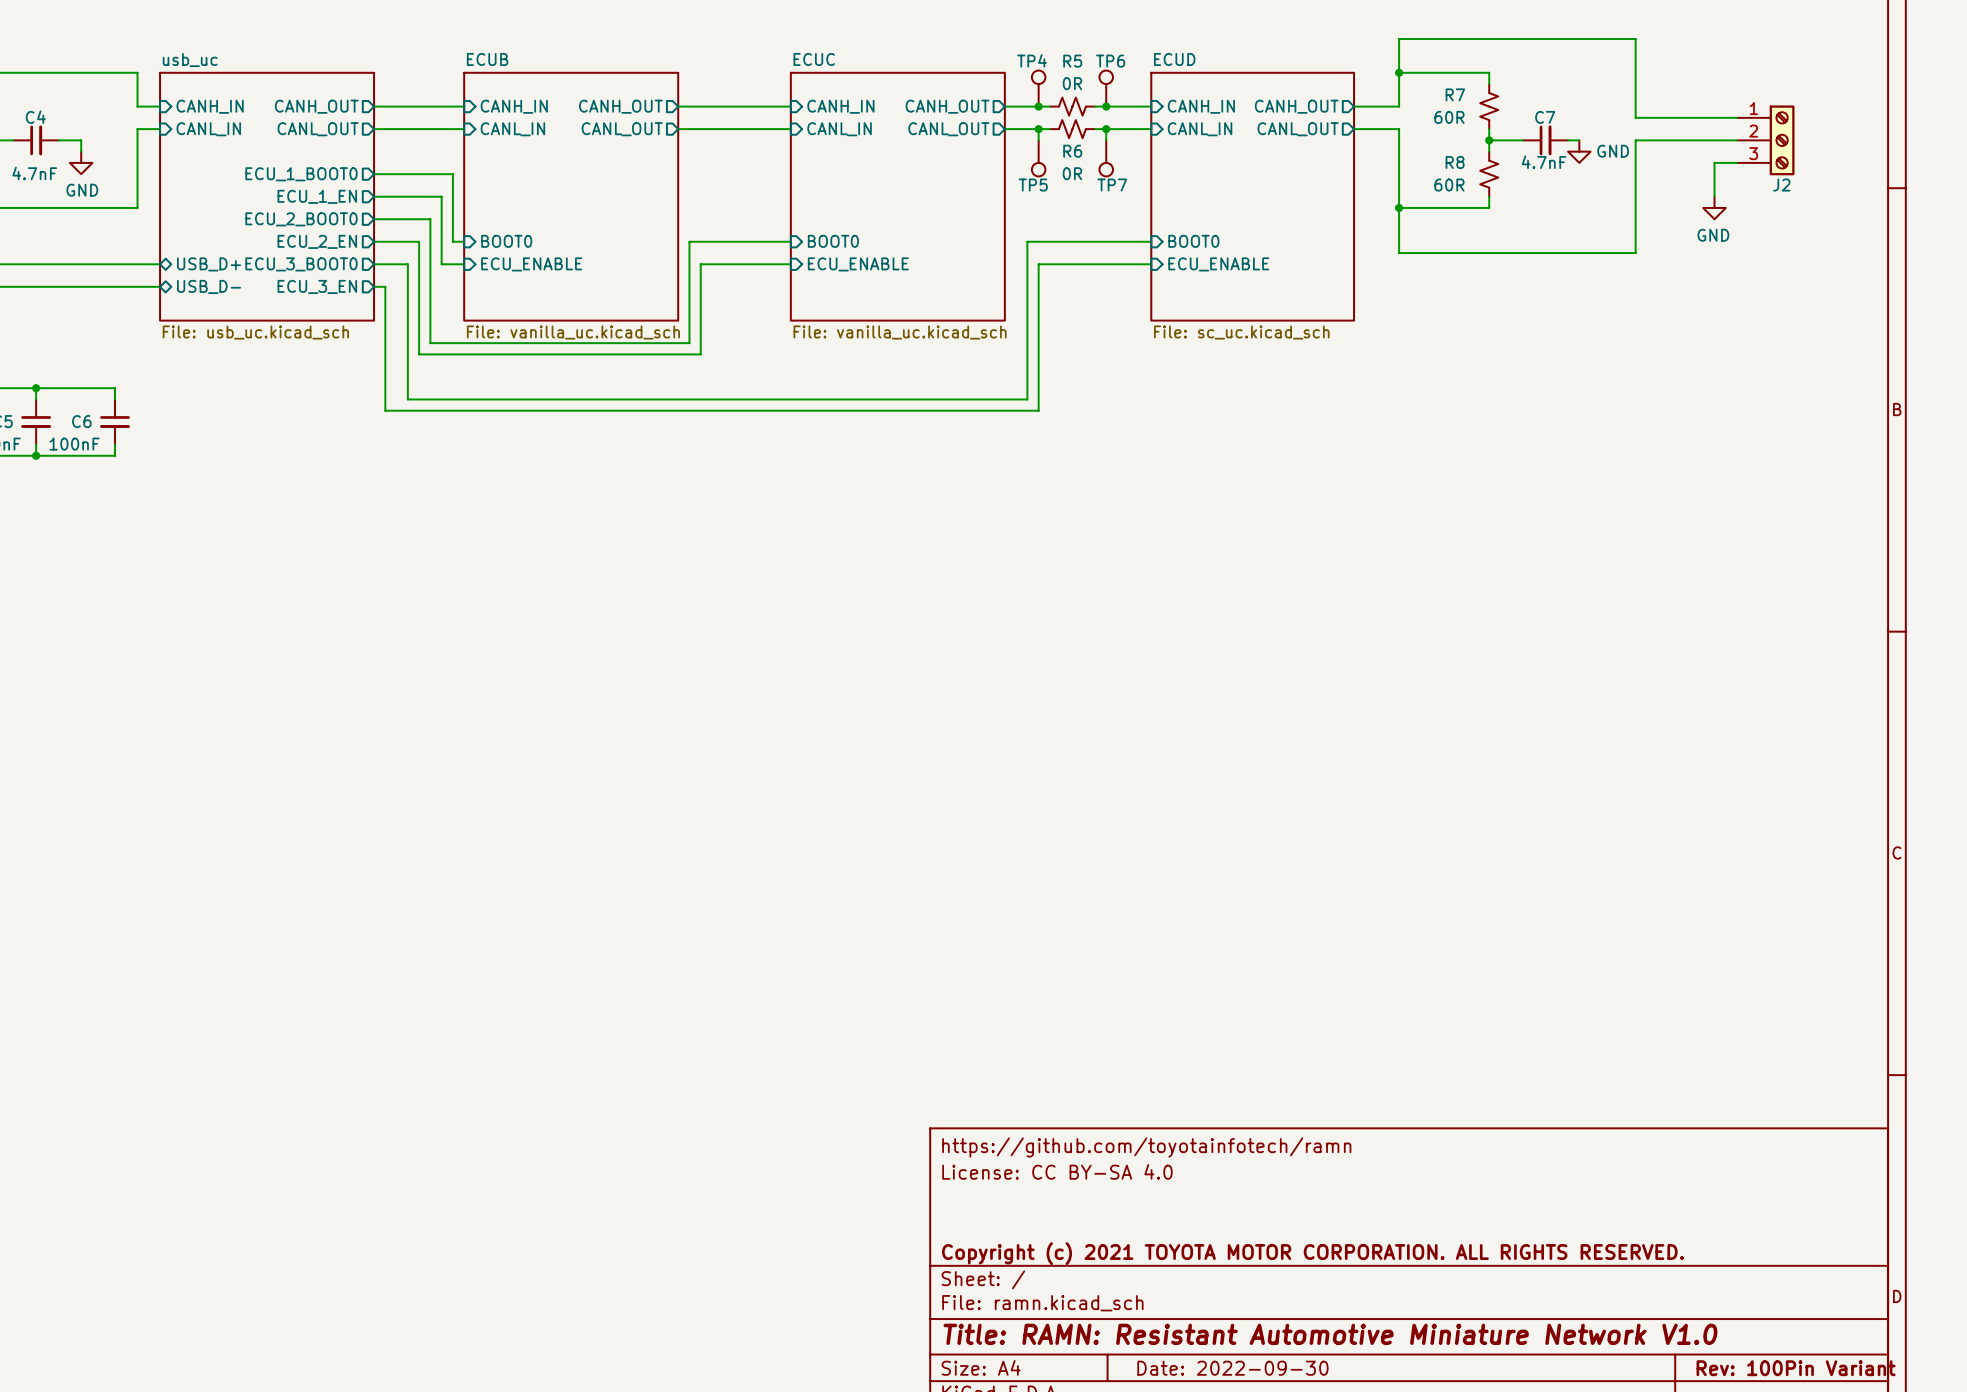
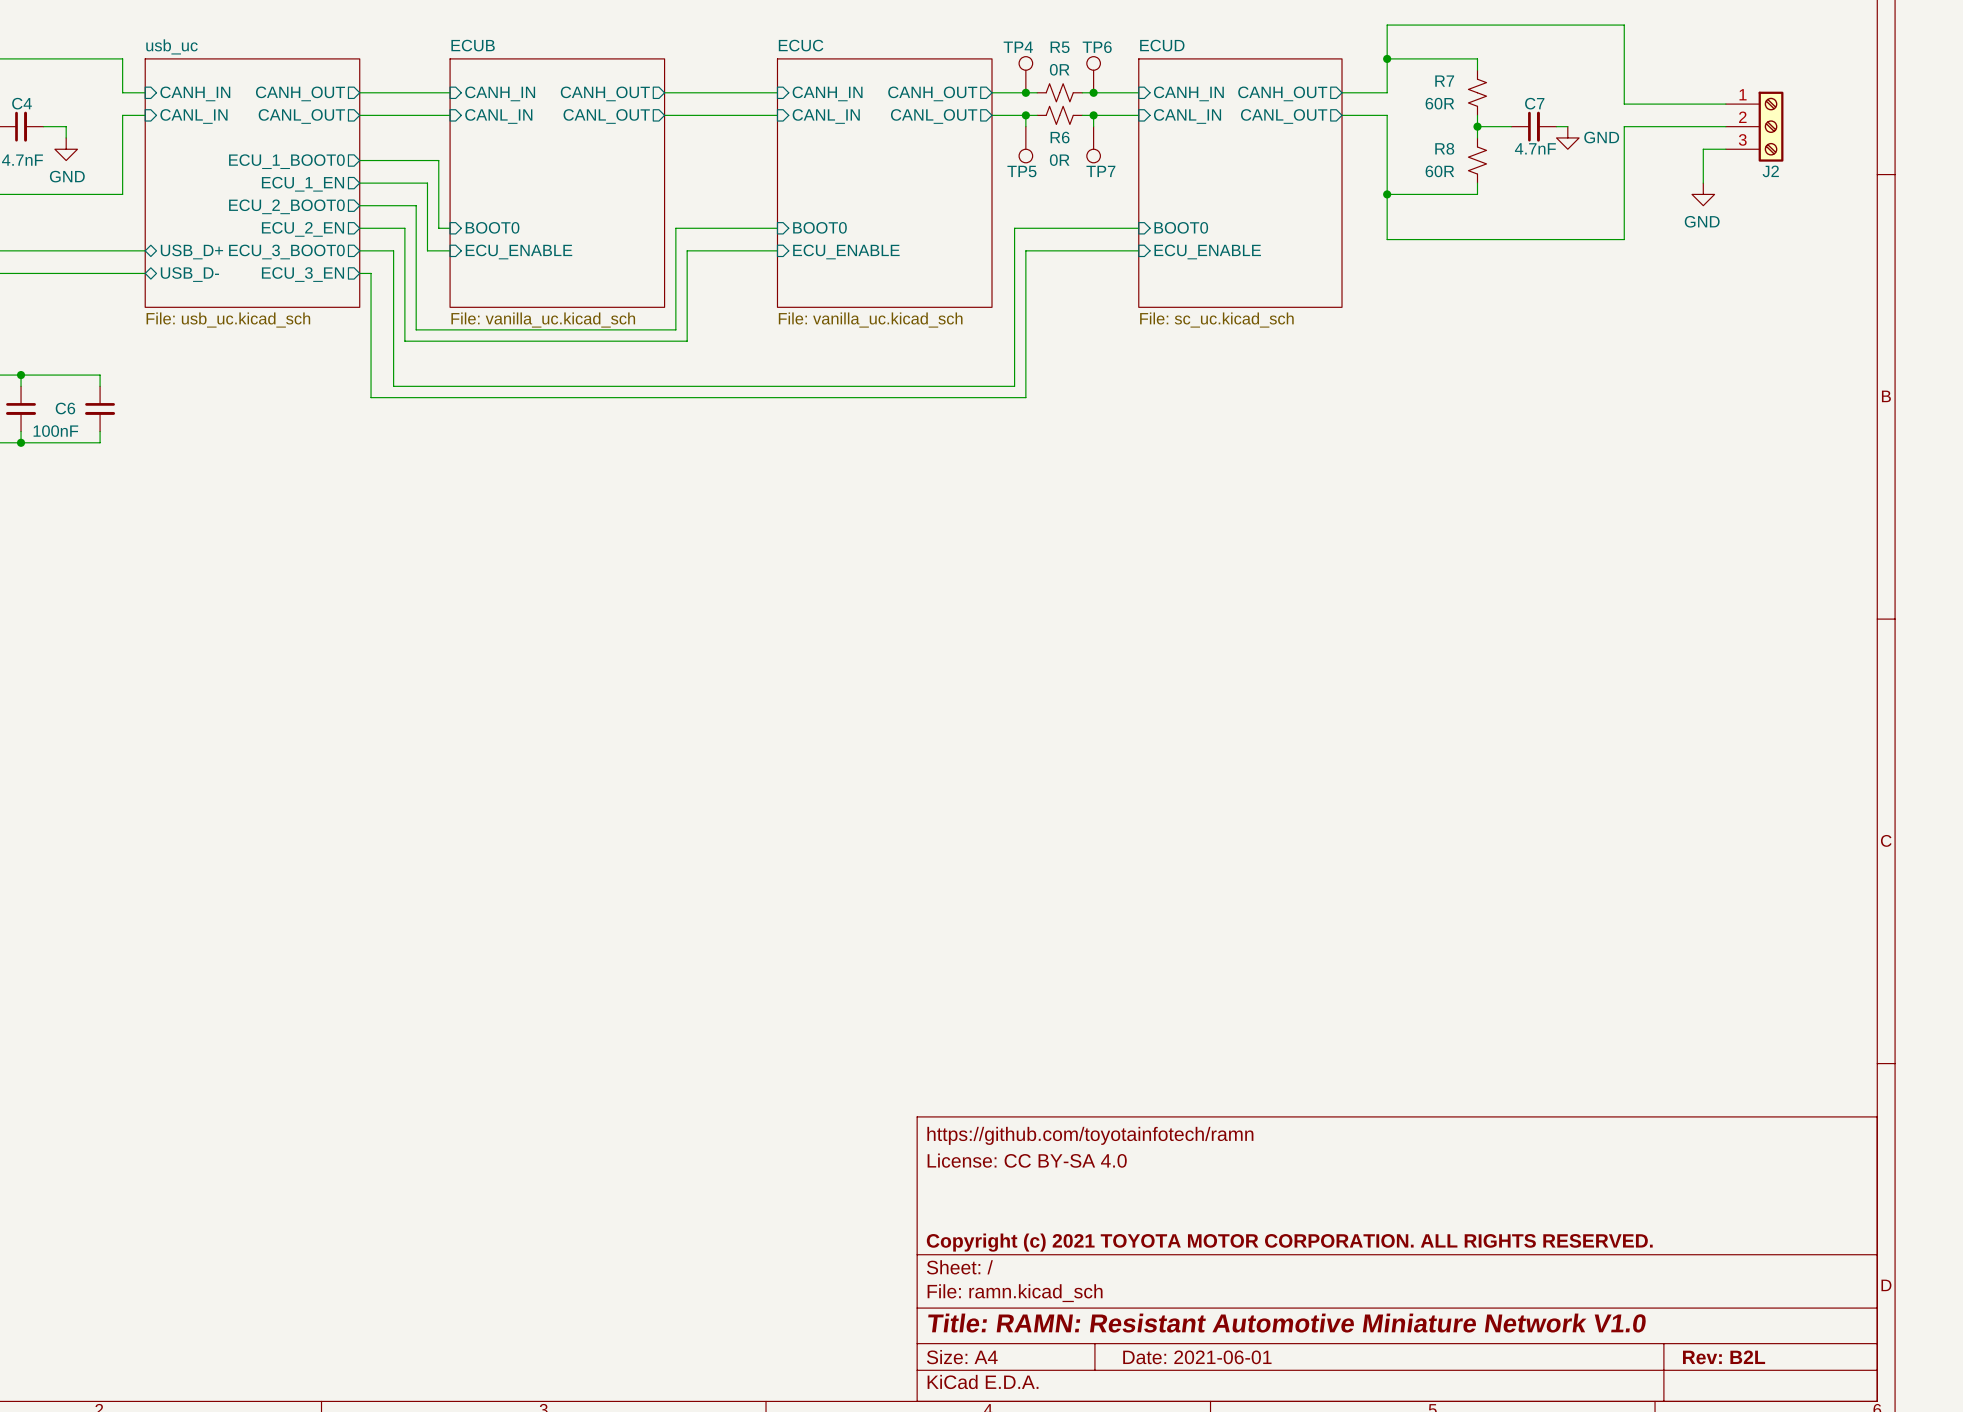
title block: Date: 2022-09-30 (1232, 1368) -> Date: 2021-06-01 (1197, 1357)
title block: Rev: 100Pin Variant (1796, 1368) -> Rev: B2L (1724, 1357)

